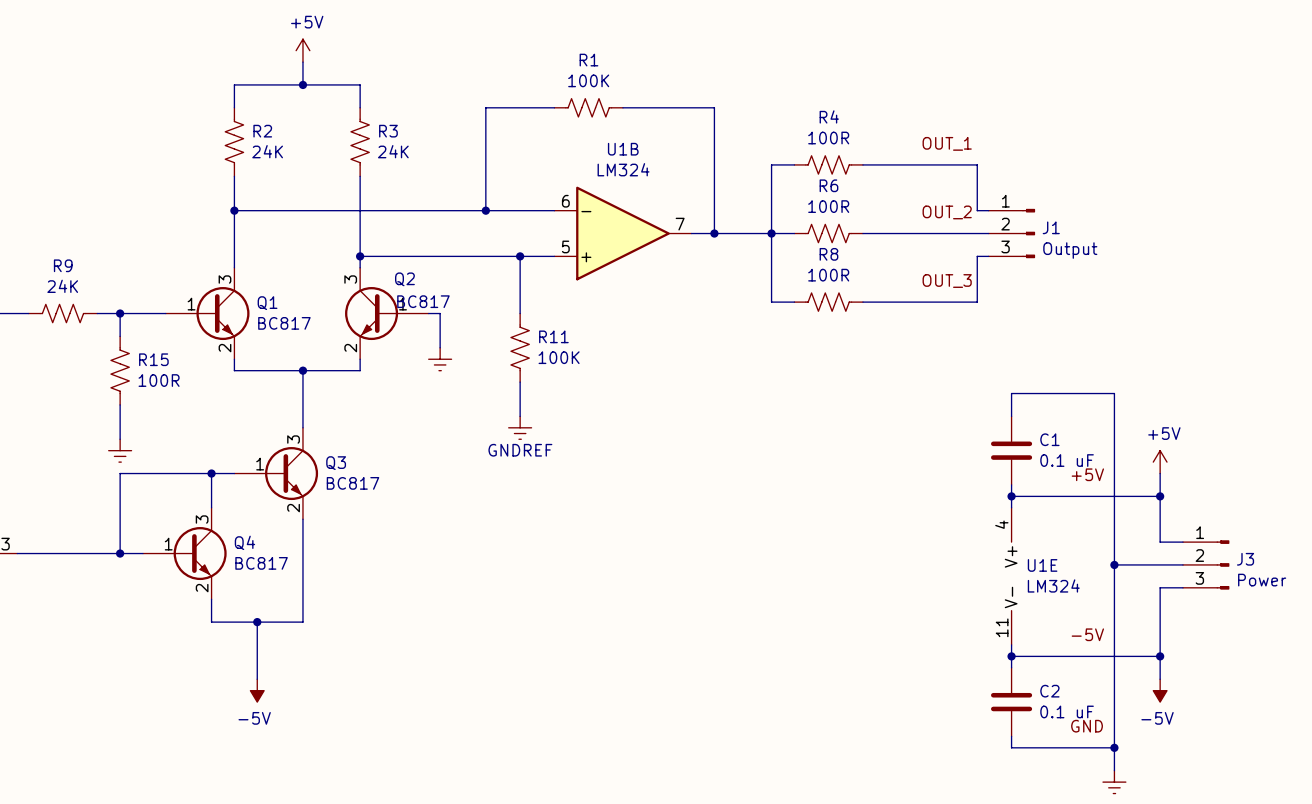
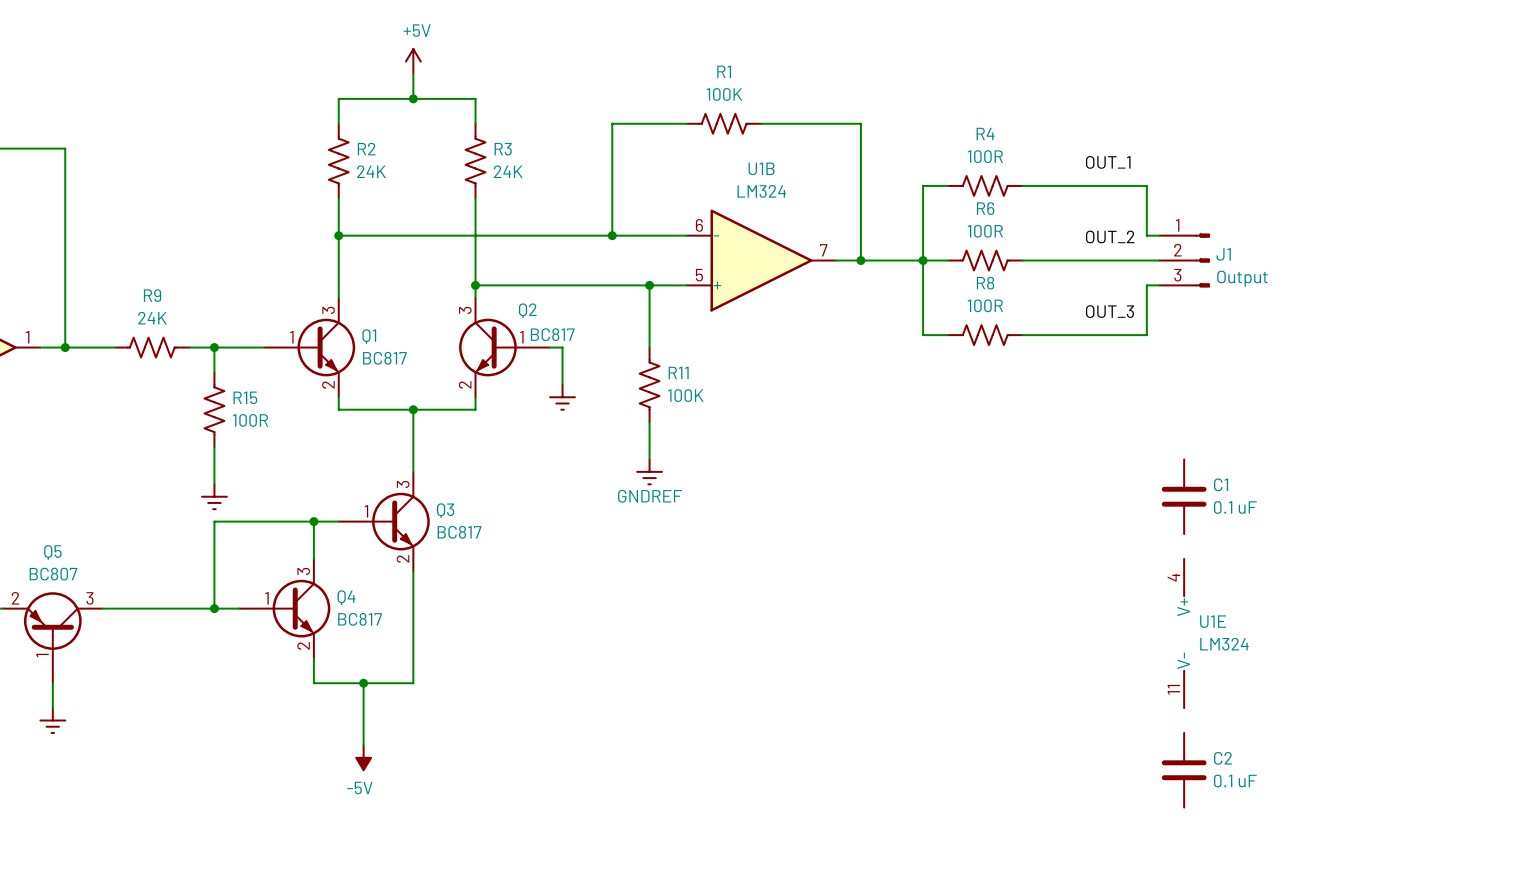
wire: (1011, 416) (1011, 393) (1114, 393) (1114, 770) -> none
power symbol: +5V (1160, 462) -> none
wire: (1160, 473) (1160, 542) (1182, 542) -> none
label: +5V (1087, 474) -> none
wire: (1011, 484) (1011, 507) -> none
wire: (1011, 496) (1160, 496) -> none
junction: (1011, 496) -> none
junction: (1160, 496) -> none
wire: (1114, 564) (1182, 564) -> none
junction: (1114, 564) -> none
J3: Power (1206, 564) -> none
wire: (1182, 587) (1160, 587) (1160, 679) -> none
label: -5V (1087, 634) -> none
wire: (1011, 644) (1011, 667) -> none
wire: (1011, 656) (1160, 656) -> none
junction: (1011, 656) -> none
junction: (1160, 656) -> none
power symbol: -5V (1160, 690) -> none
label: GND (1087, 726) -> none
wire: (1011, 736) (1011, 747) (1114, 747) -> none
junction: (1114, 747) -> none
power symbol: (1114, 782) -> none

